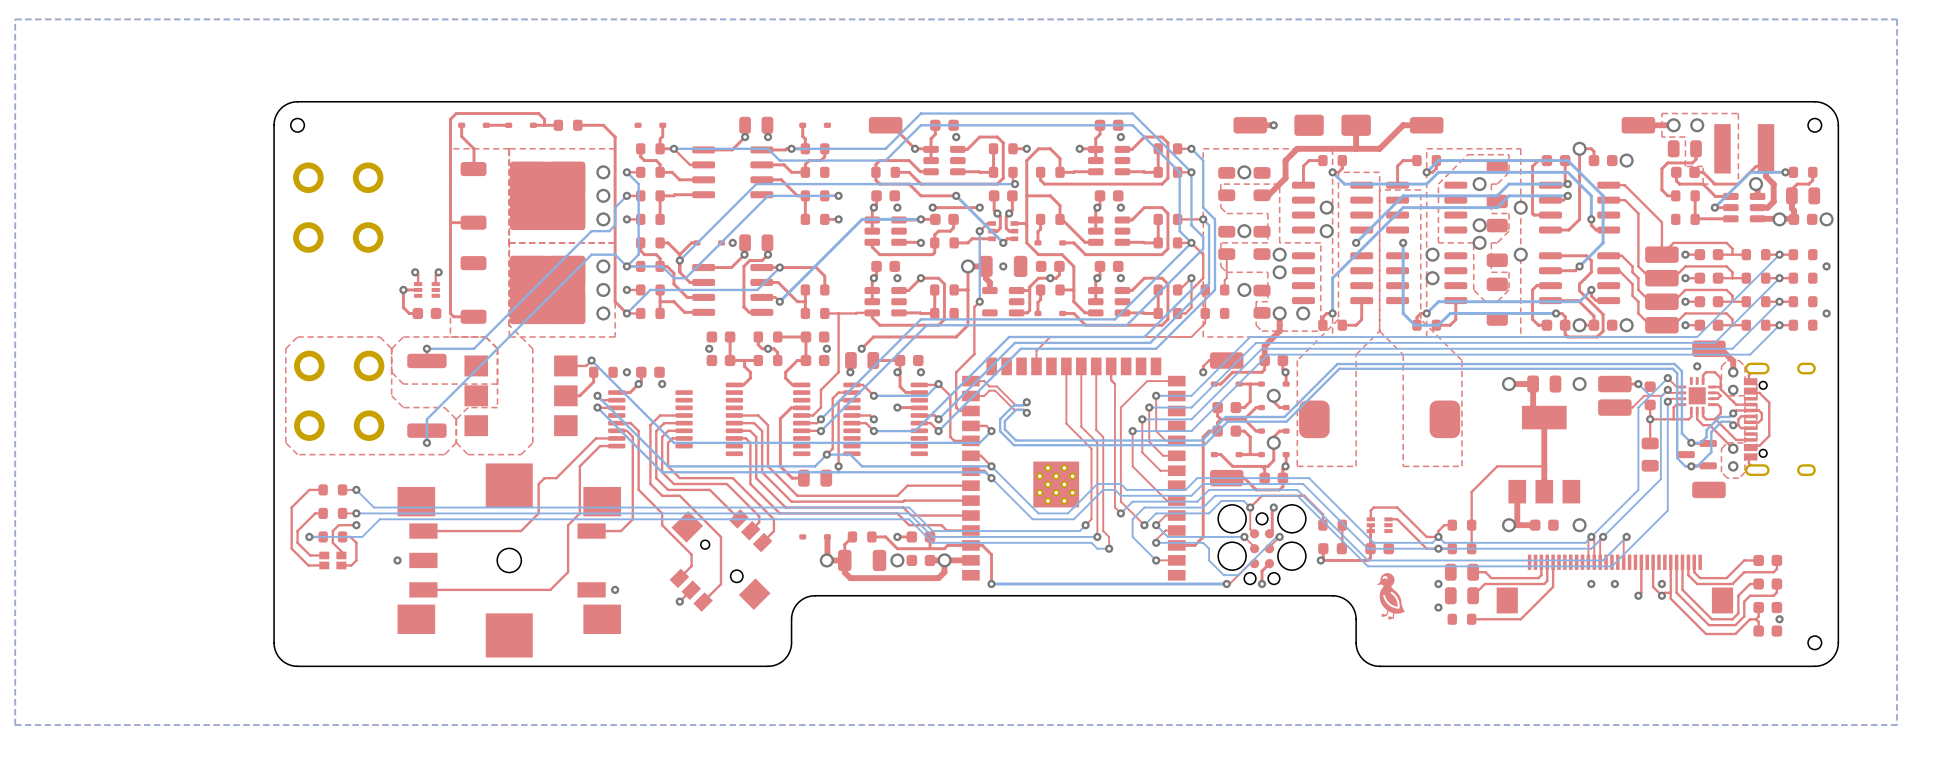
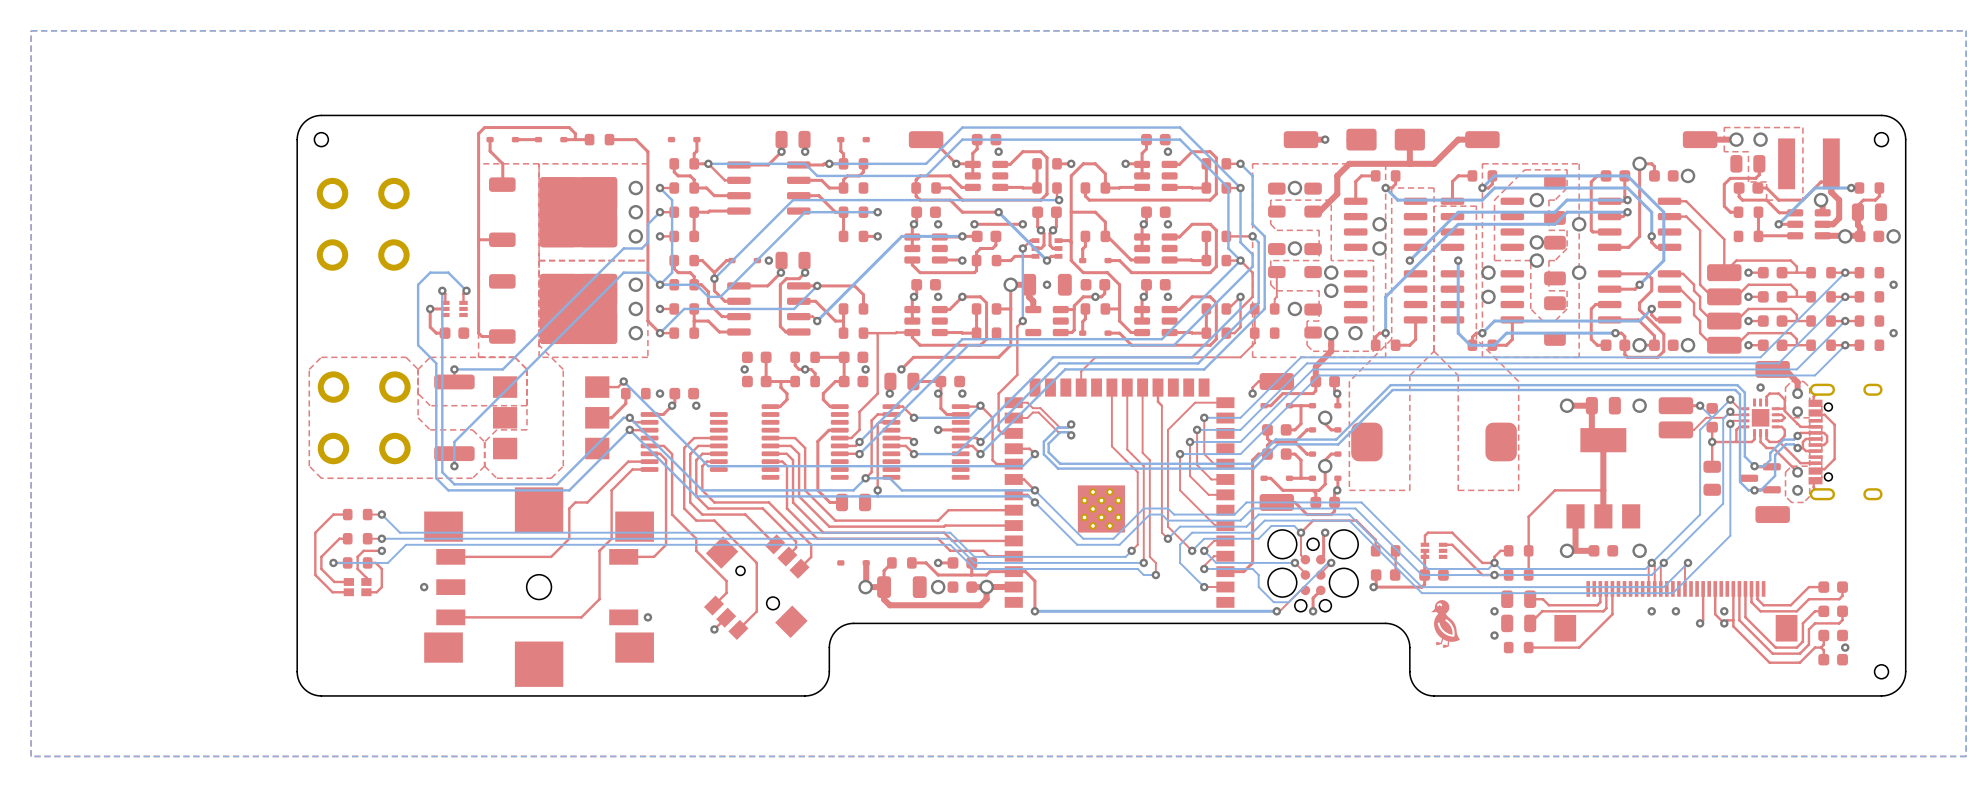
bottom track: none -> (442, 290) (442, 472) (454, 484) (557, 484) (623, 417) (629, 417)
bottom track: none -> (466, 290) (448, 272) (430, 272) (418, 284) (418, 345) (436, 363) (436, 478) (448, 490) (569, 490) (629, 429)

